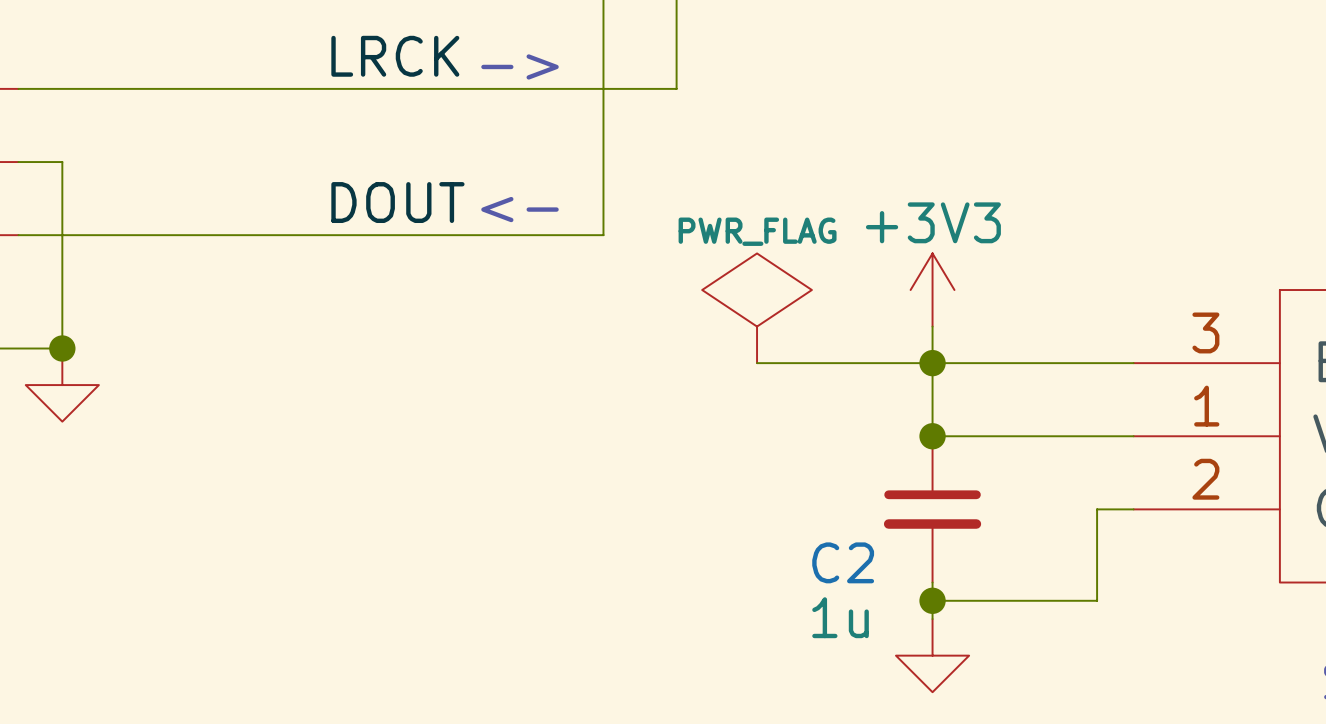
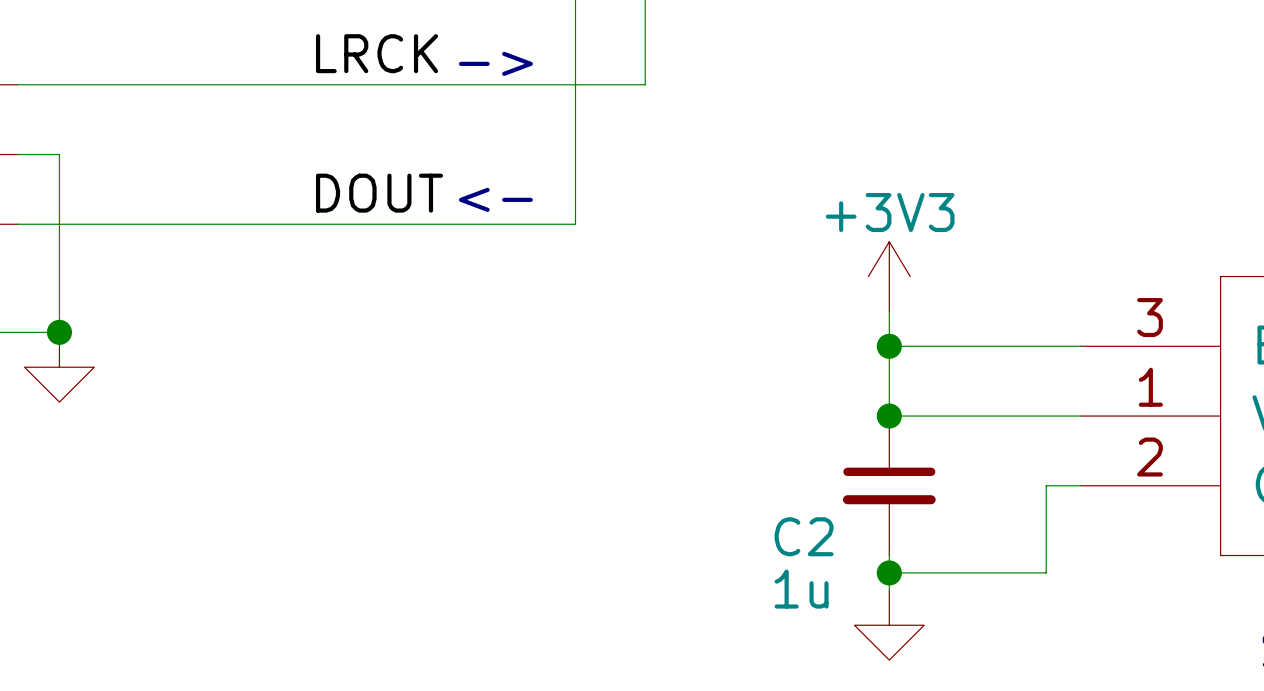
power symbol: PWR_FLAG (757, 308) -> none
wire: (757, 363) (932, 363) -> none

